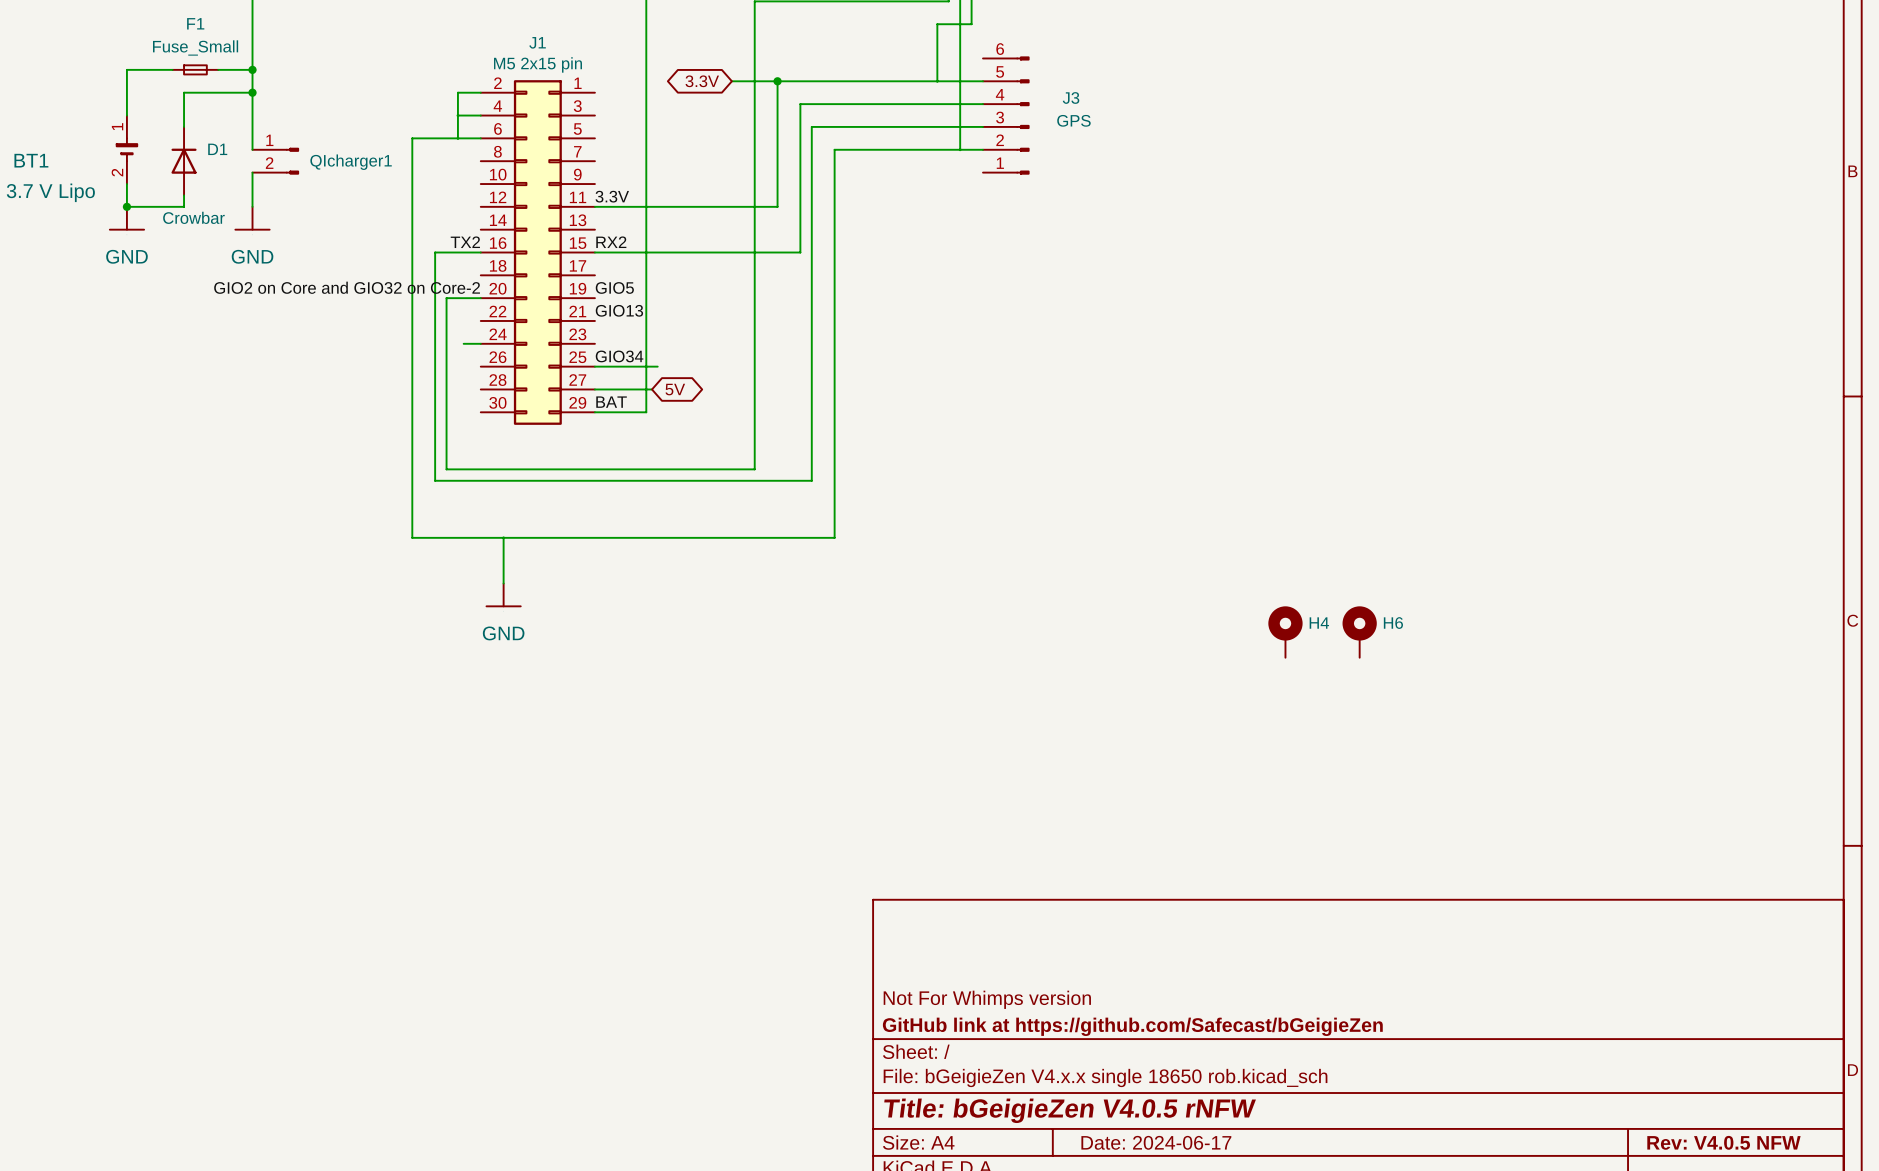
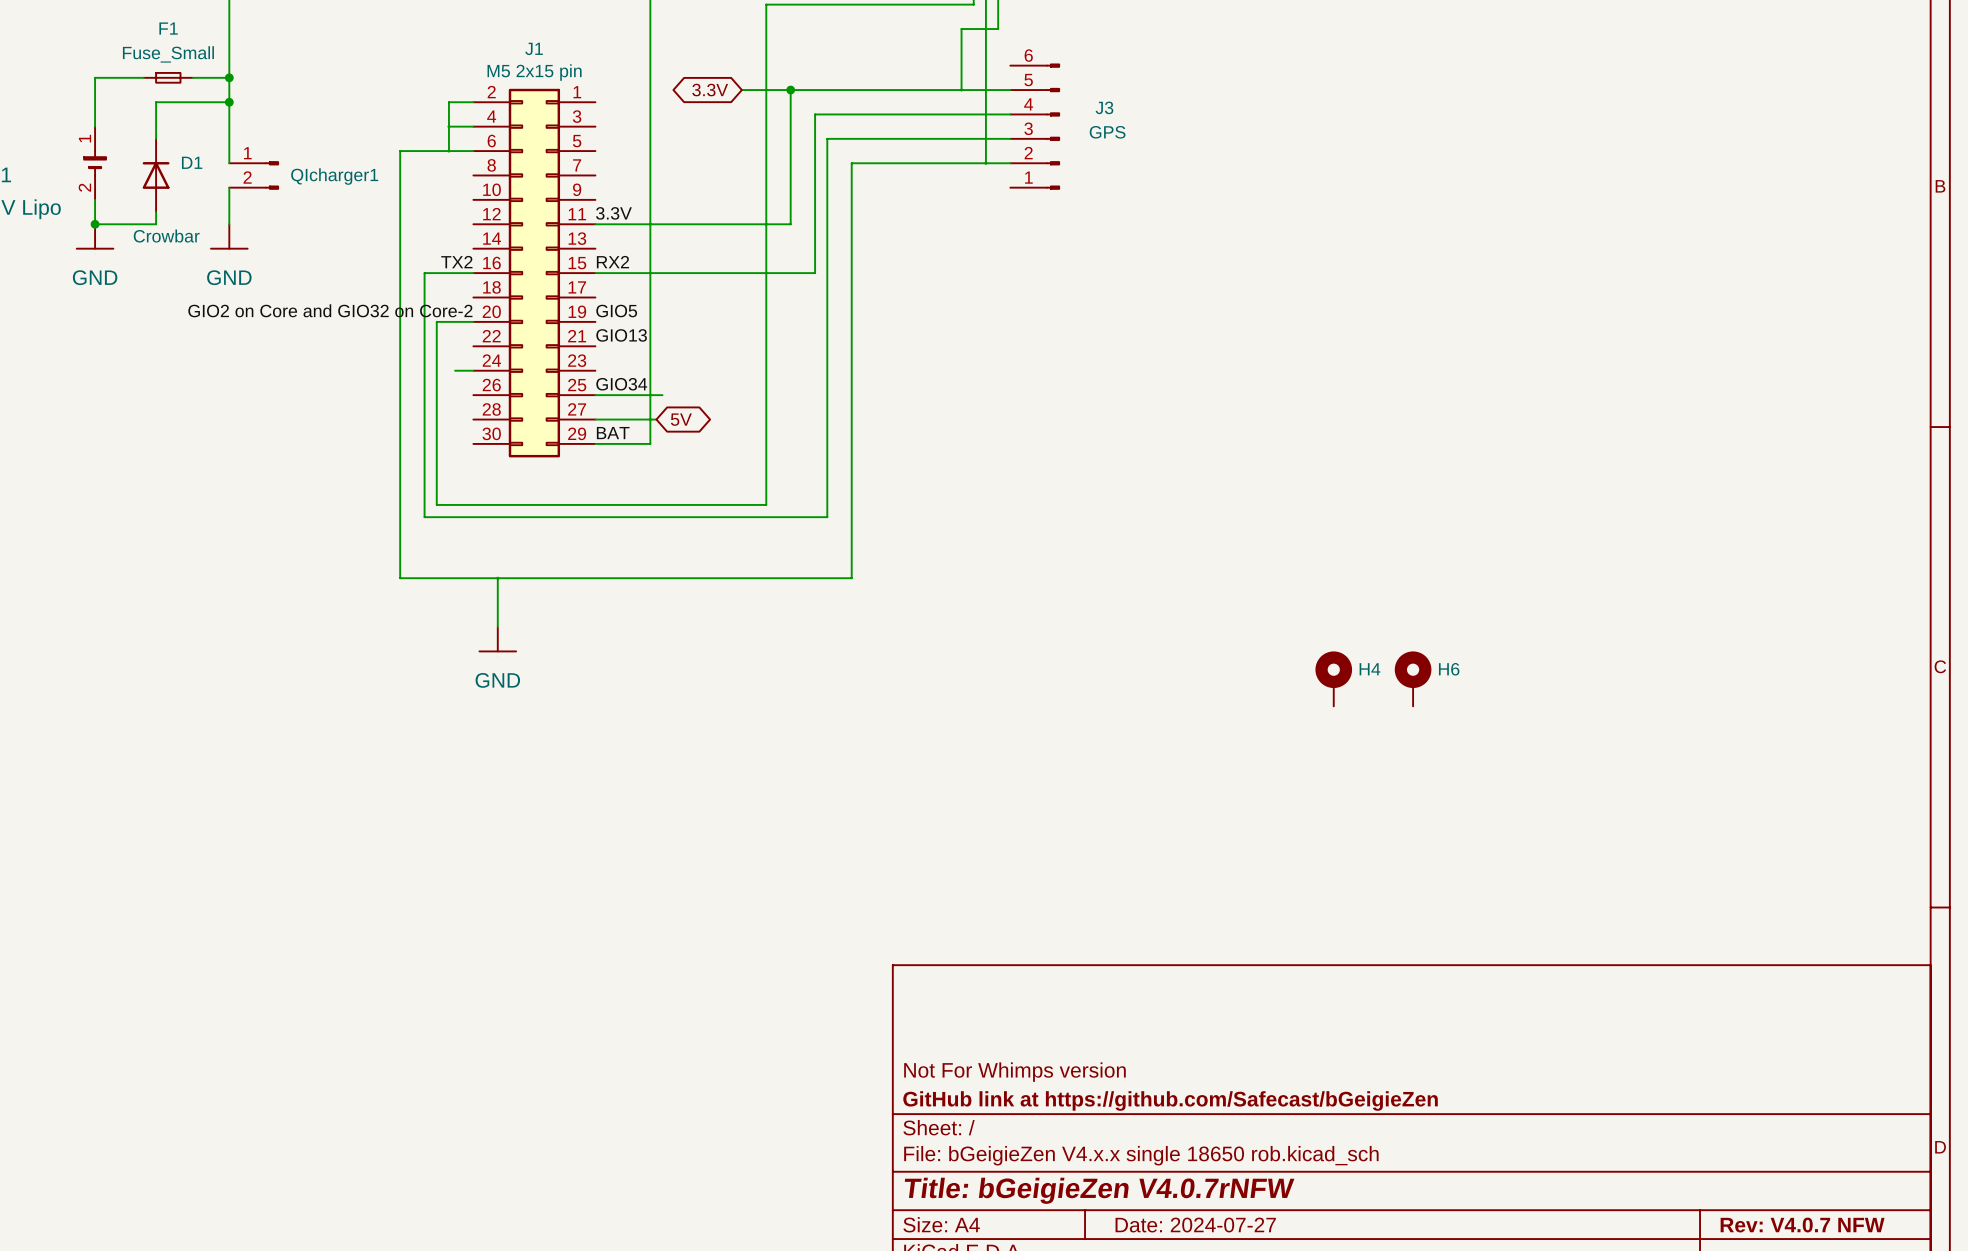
title block: Title: bGeigieZen V4.0.5 rNFW (1070, 1110) -> Title: bGeigieZen V4.0.7rNFW (1099, 1190)
title block: Date: 2024-06-17 (1156, 1142) -> Date: 2024-07-27 (1195, 1225)
title block: Rev: V4.0.5 NFW (1723, 1142) -> Rev: V4.0.7 NFW (1802, 1225)

